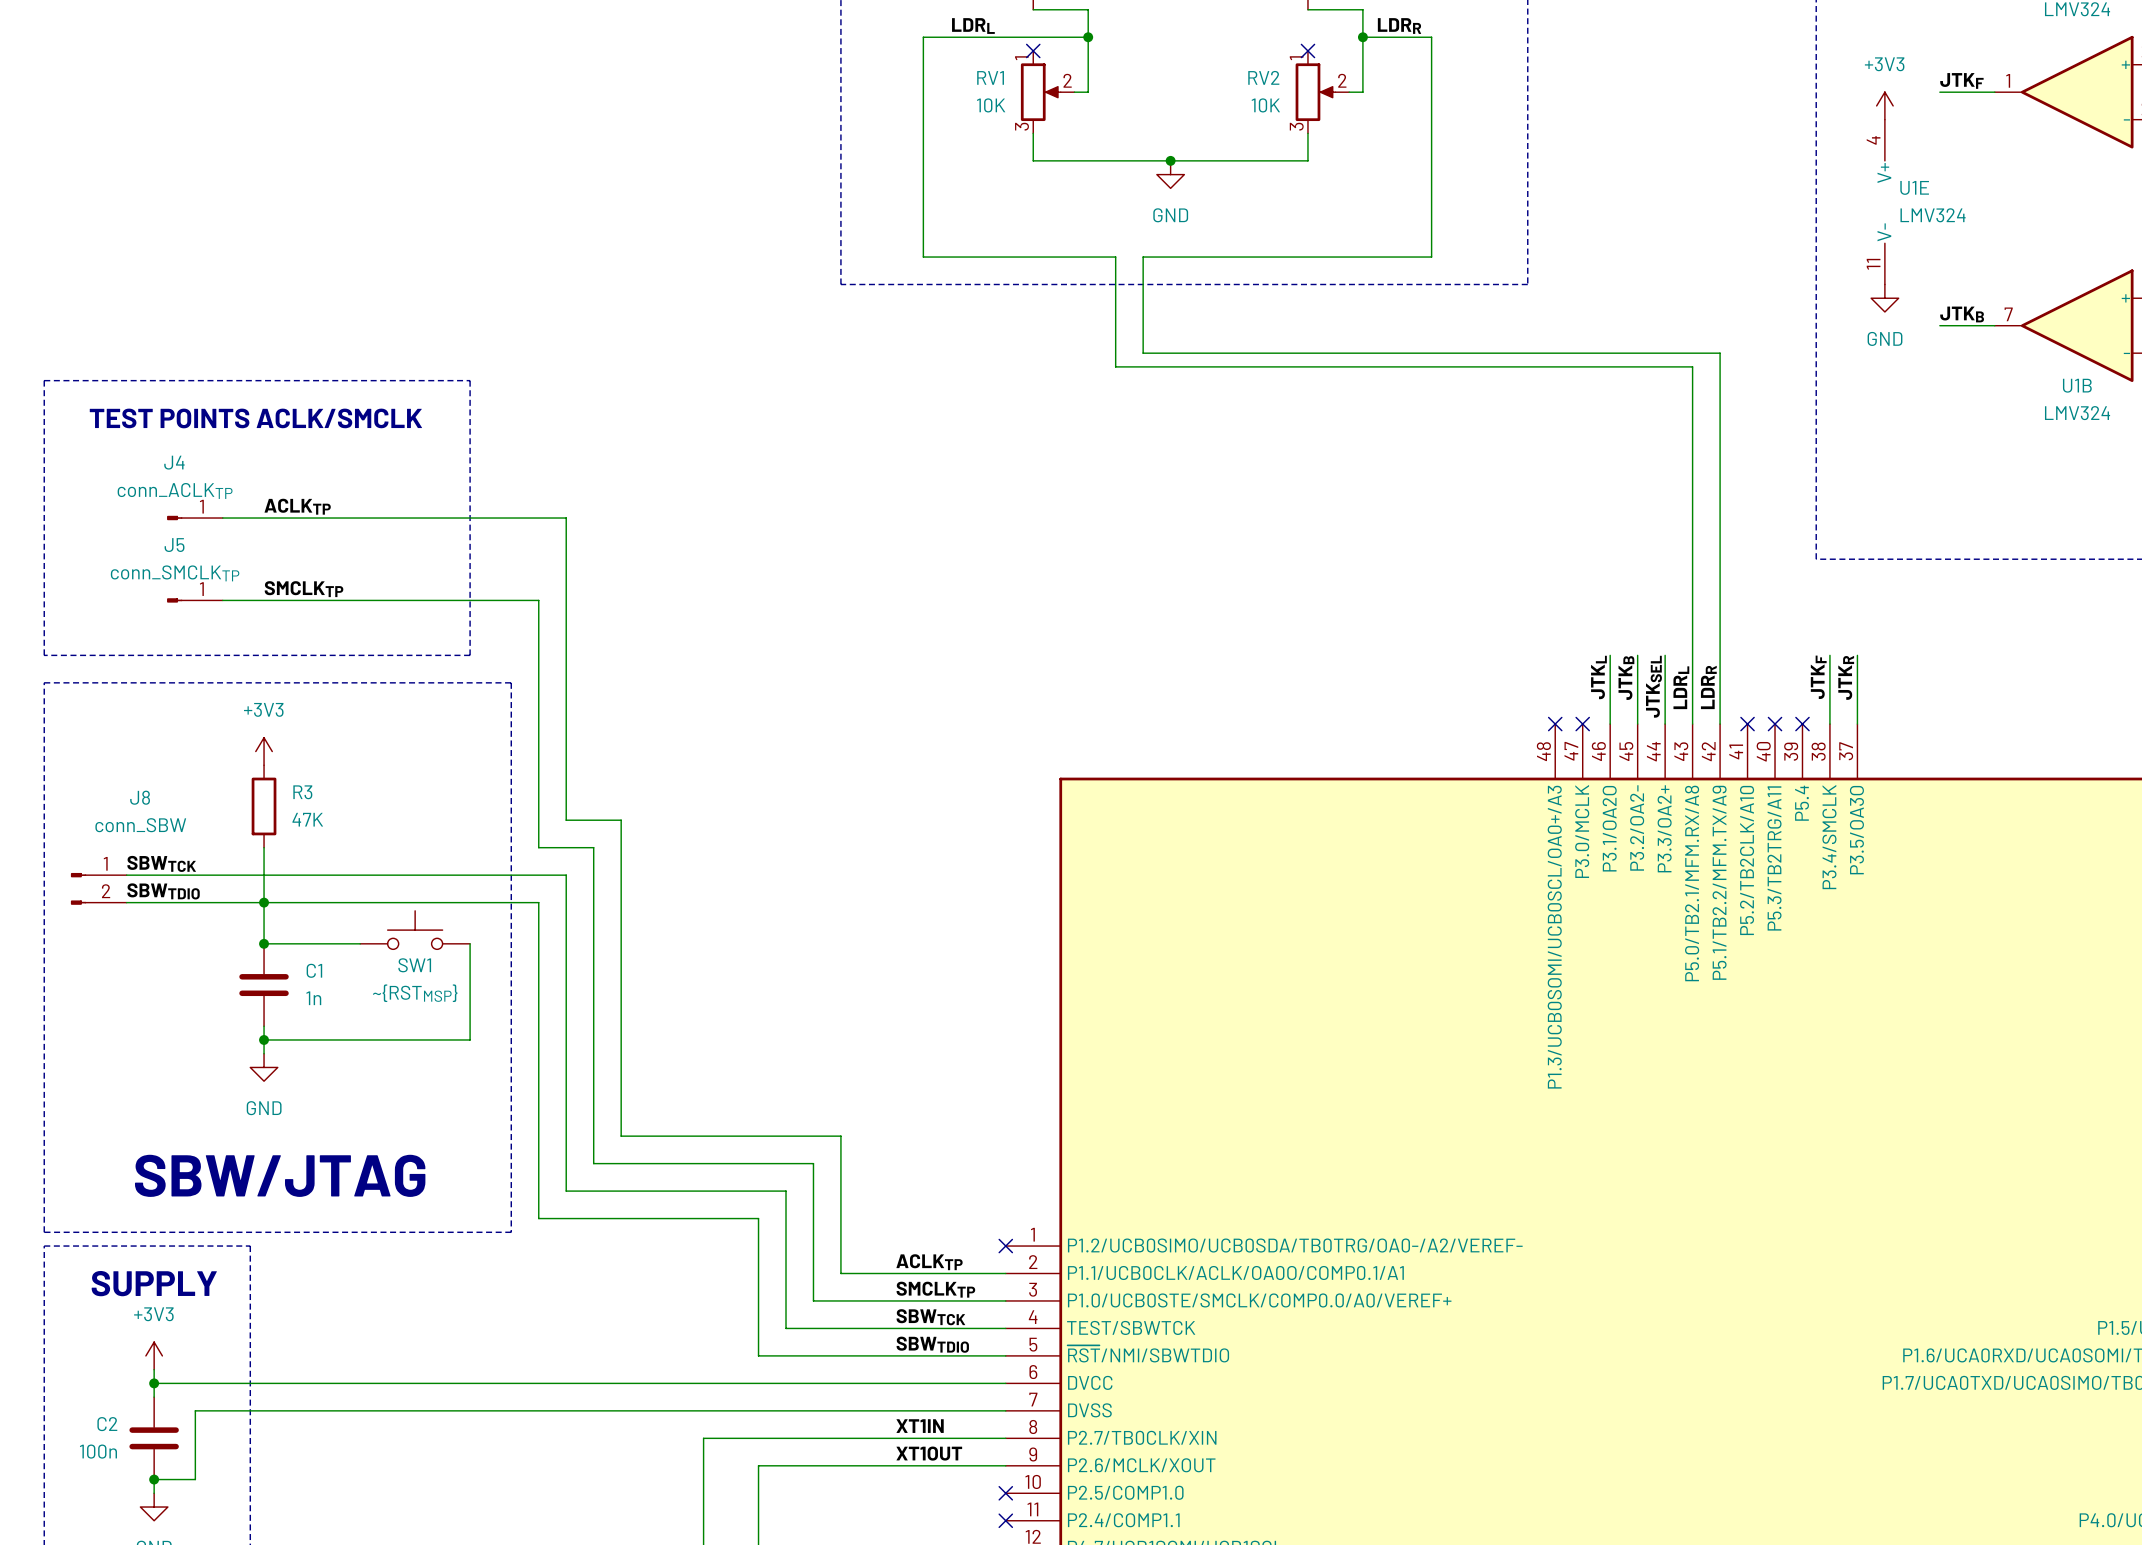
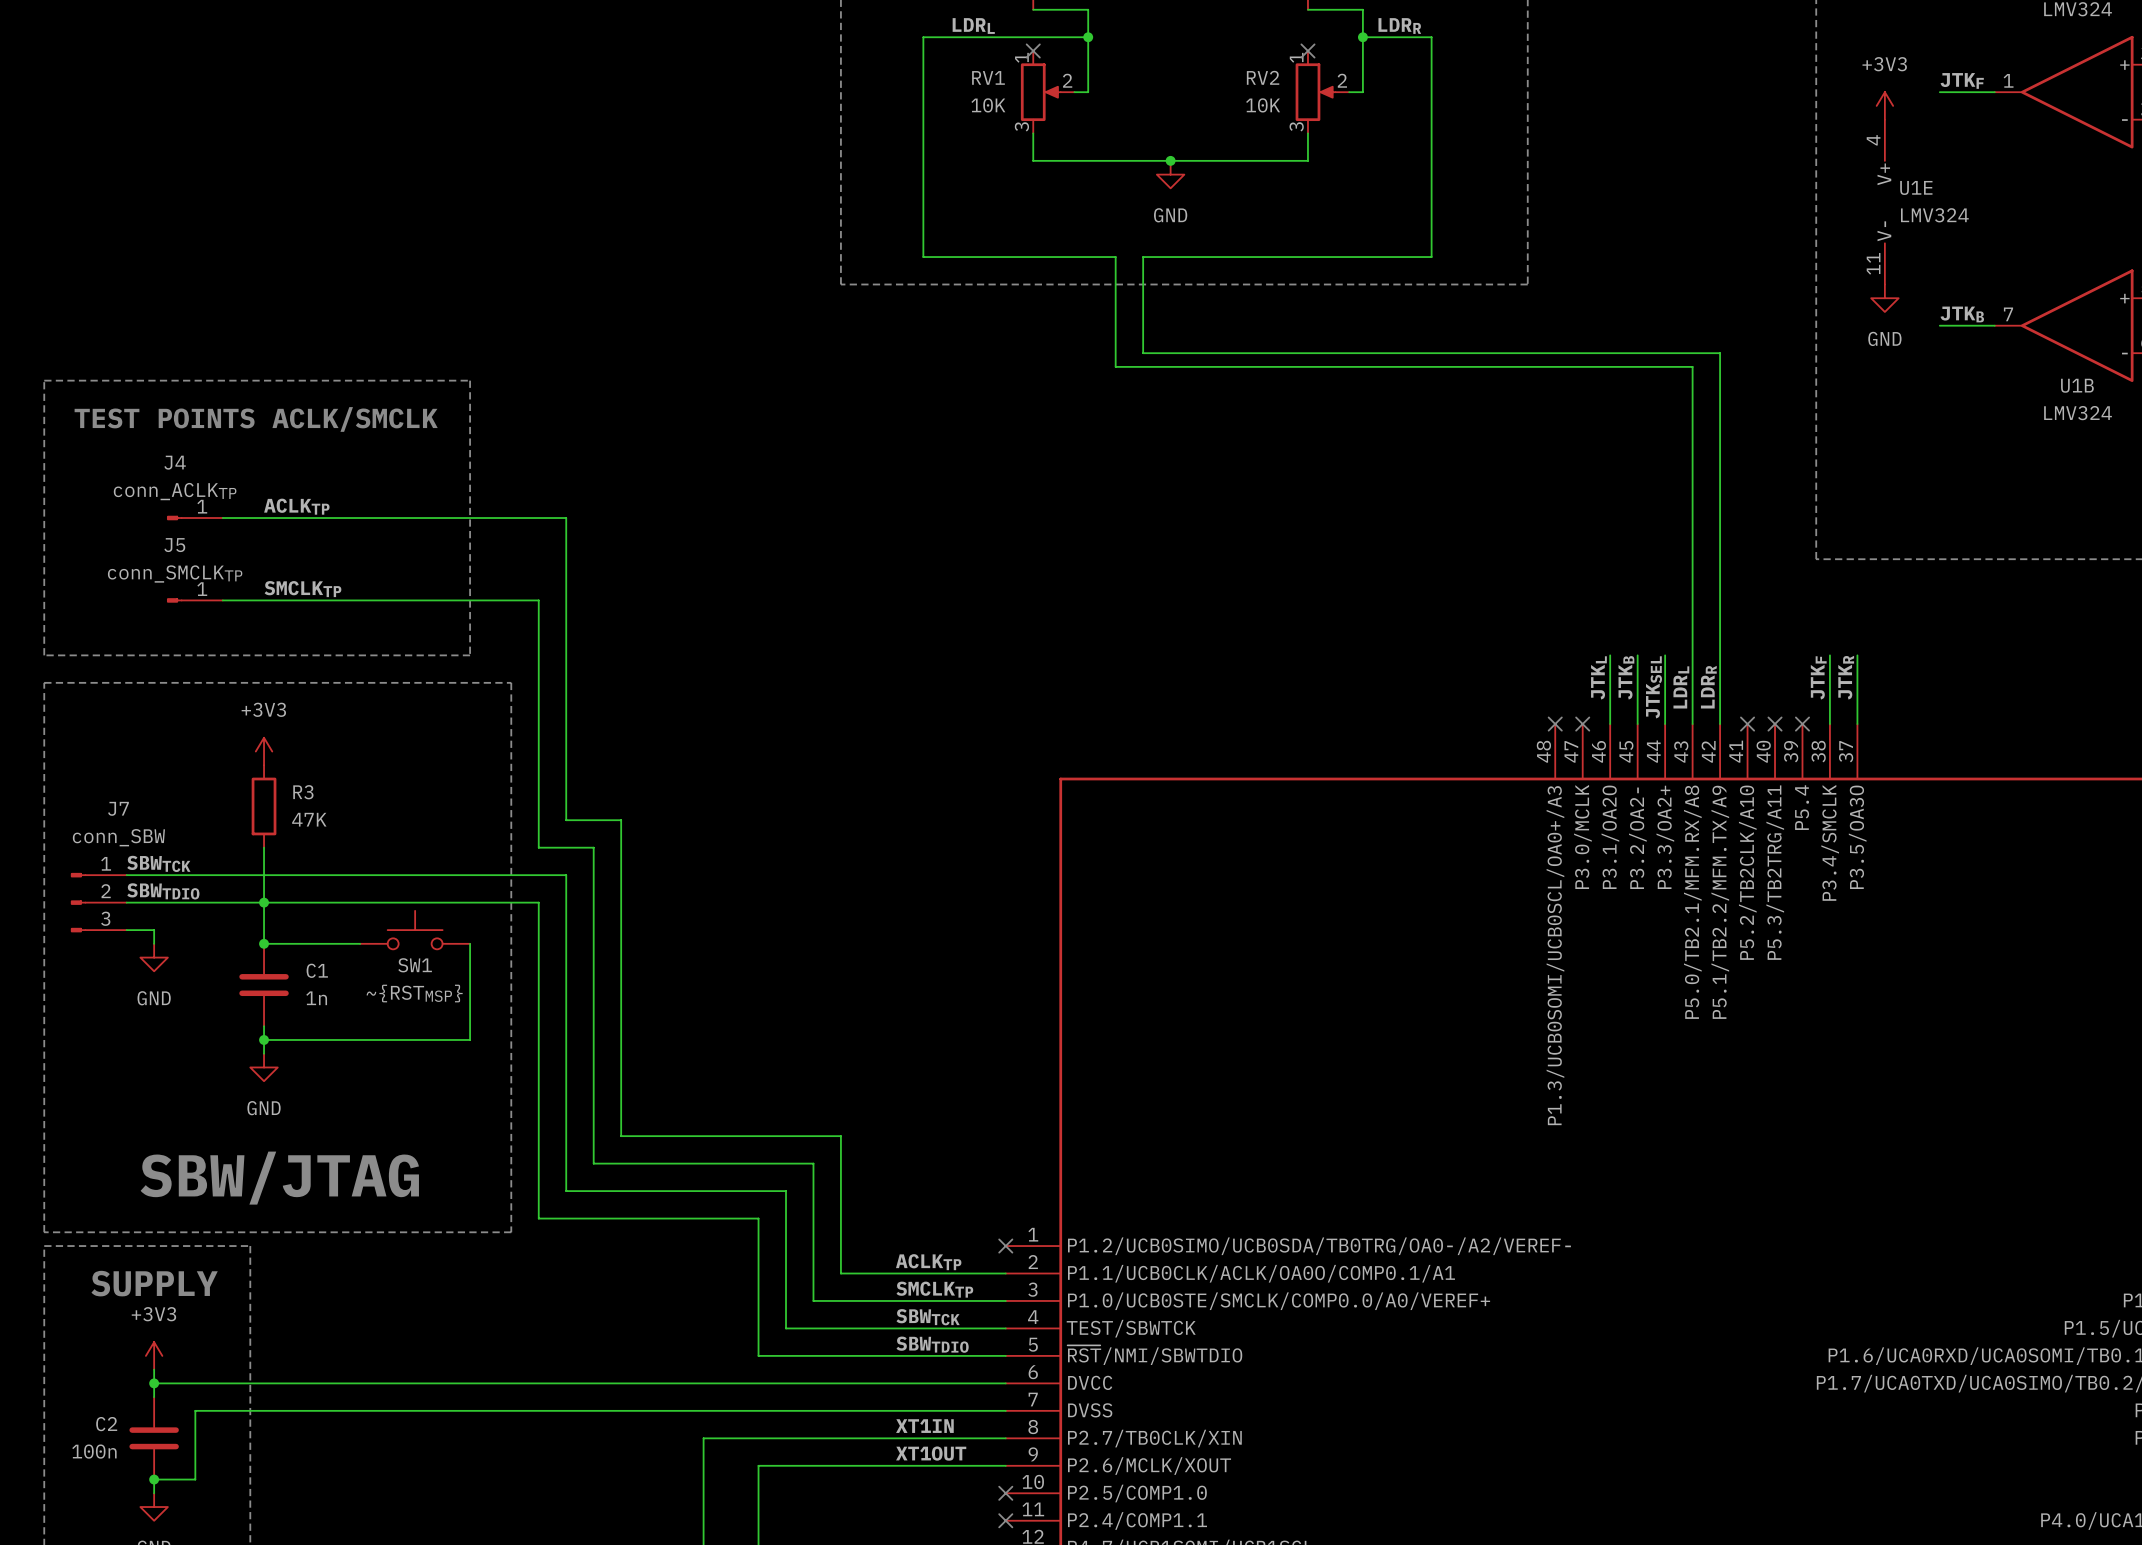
J8: conn_SBW (98, 888) -> none
J7: none -> conn_SBW (98, 902)
wire: none -> (126, 930) (154, 930) (154, 943)
power symbol: none -> GND (154, 957)

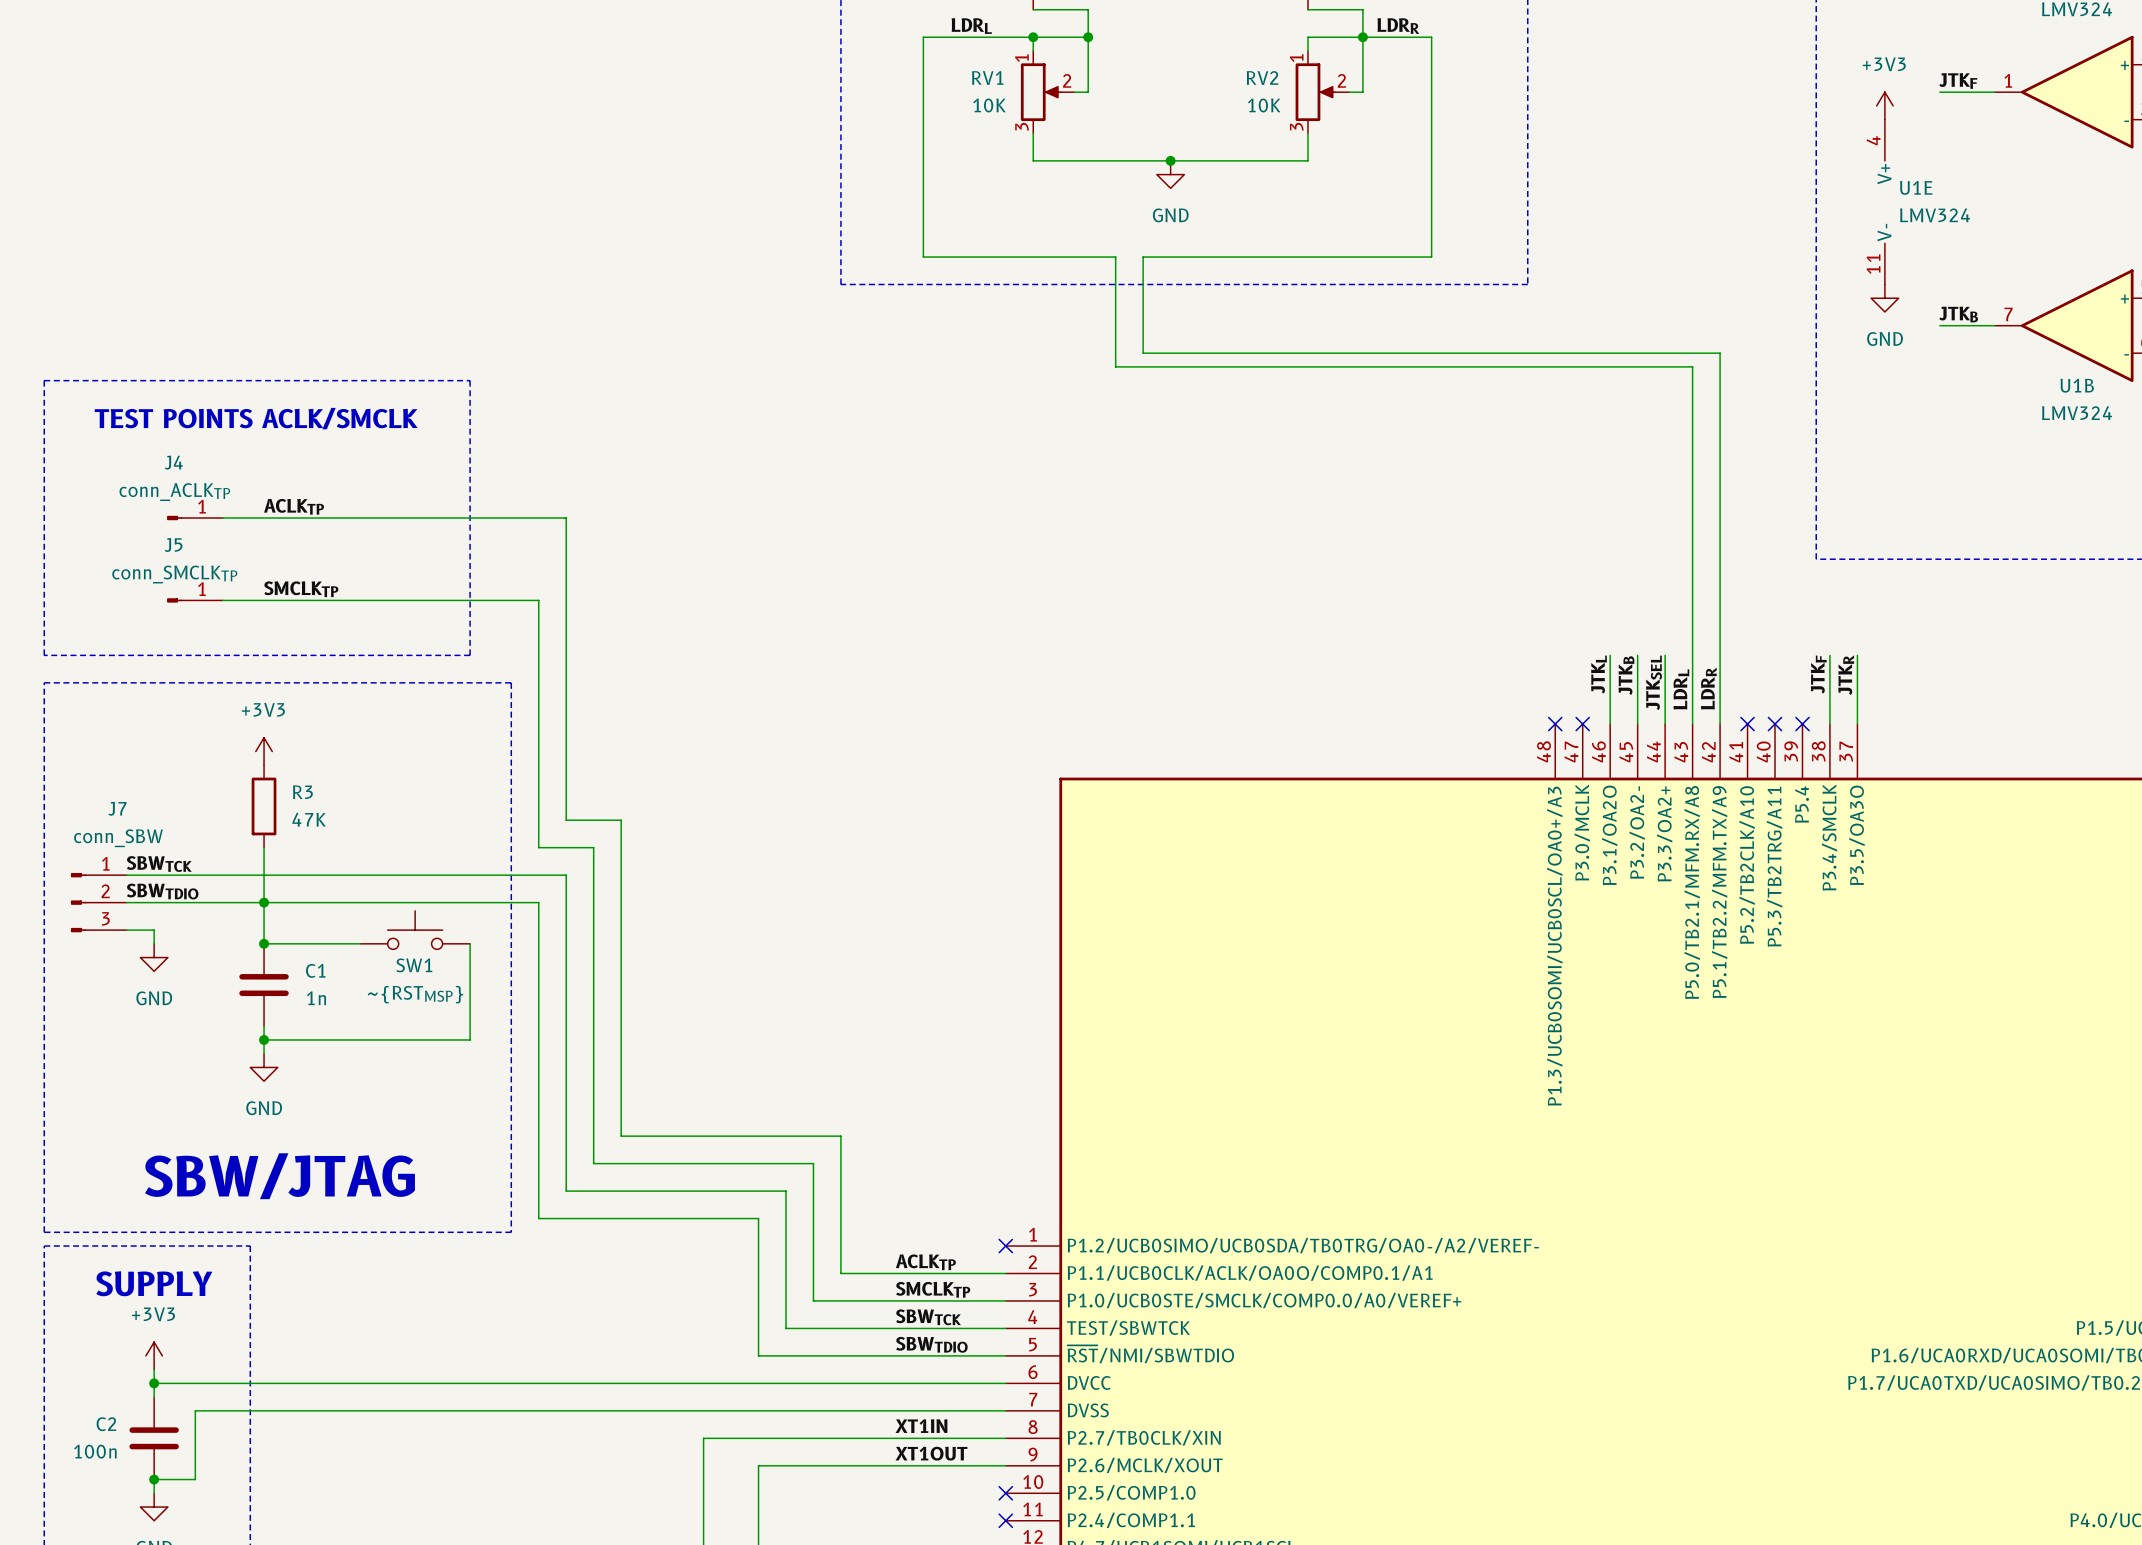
wire: none -> (1033, 37) (1033, 50)
junction: none -> (1033, 37)
wire: none -> (1362, 37) (1307, 37) (1307, 50)
no-connect mark: (1033, 50) -> none
no-connect mark: (1307, 50) -> none

